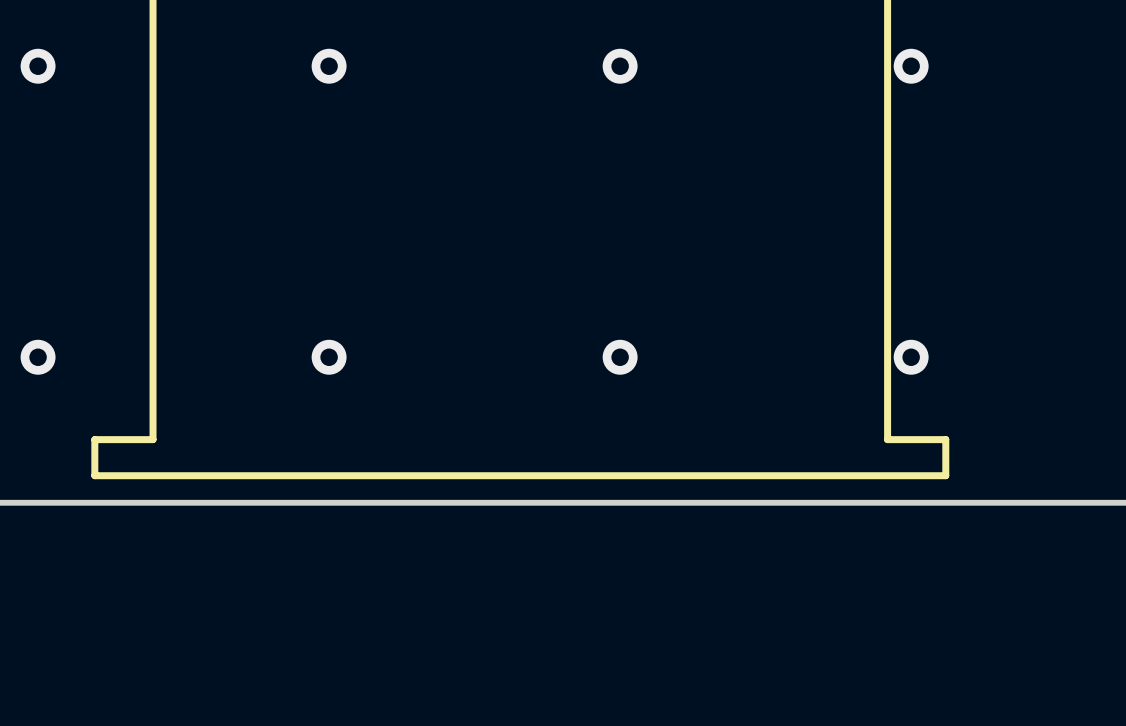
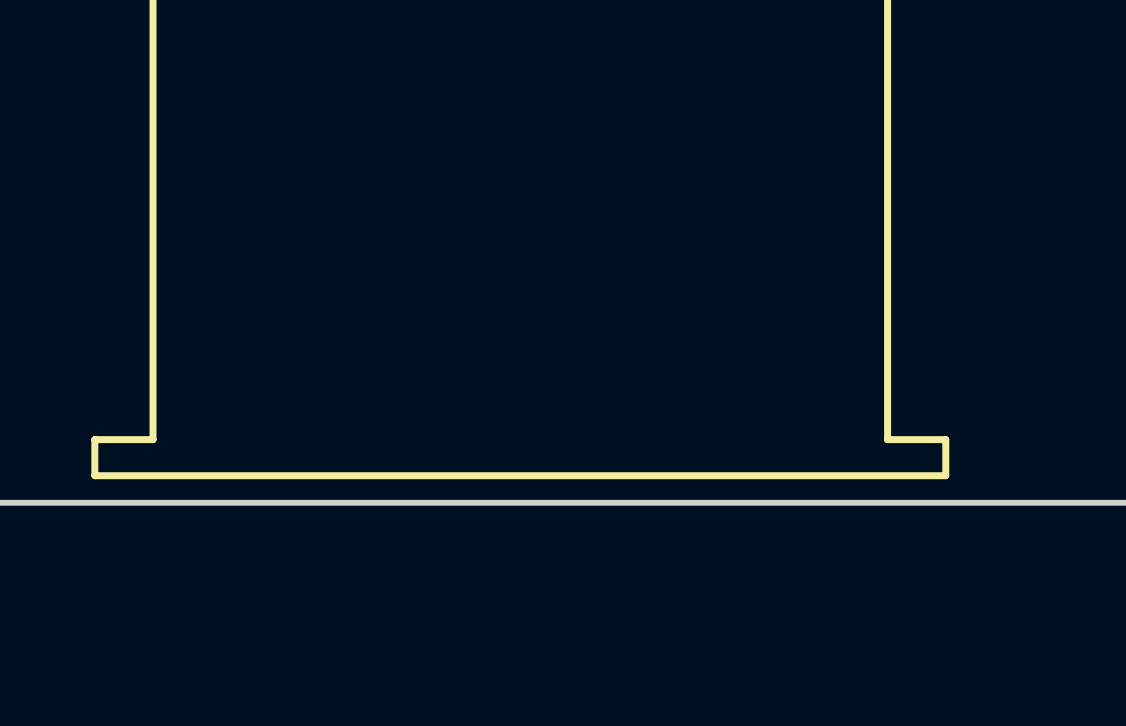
via: (38, 66) -> none
via: (329, 66) -> none
via: (620, 66) -> none
via: (911, 66) -> none
via: (38, 357) -> none
via: (329, 357) -> none
via: (620, 357) -> none
via: (911, 357) -> none

